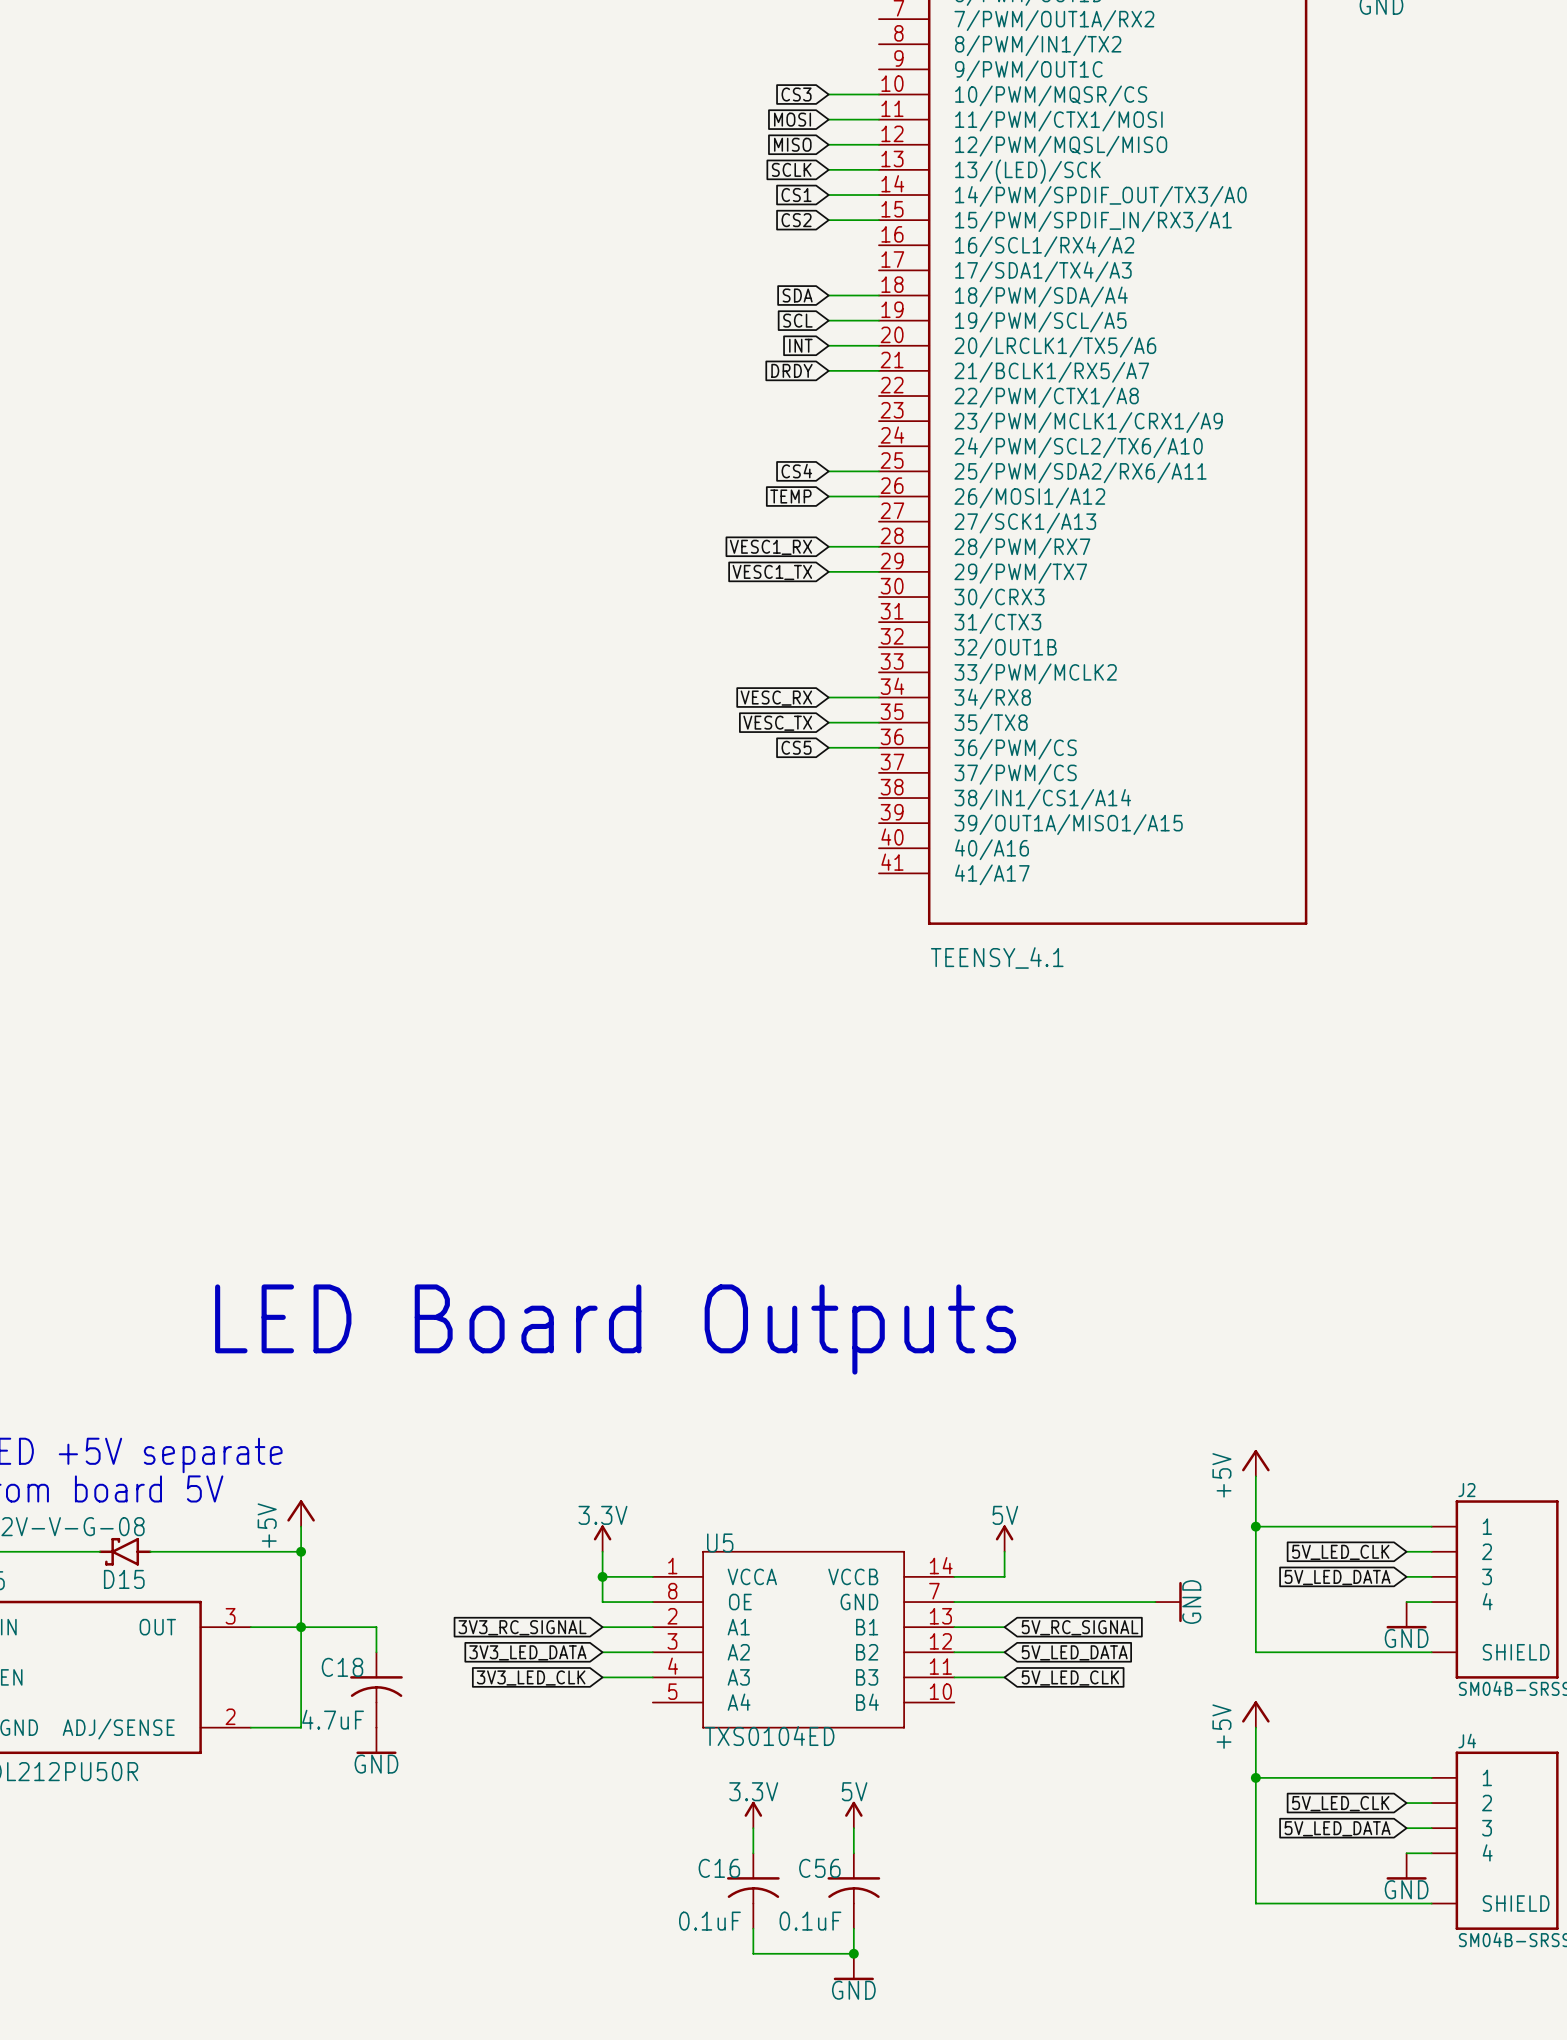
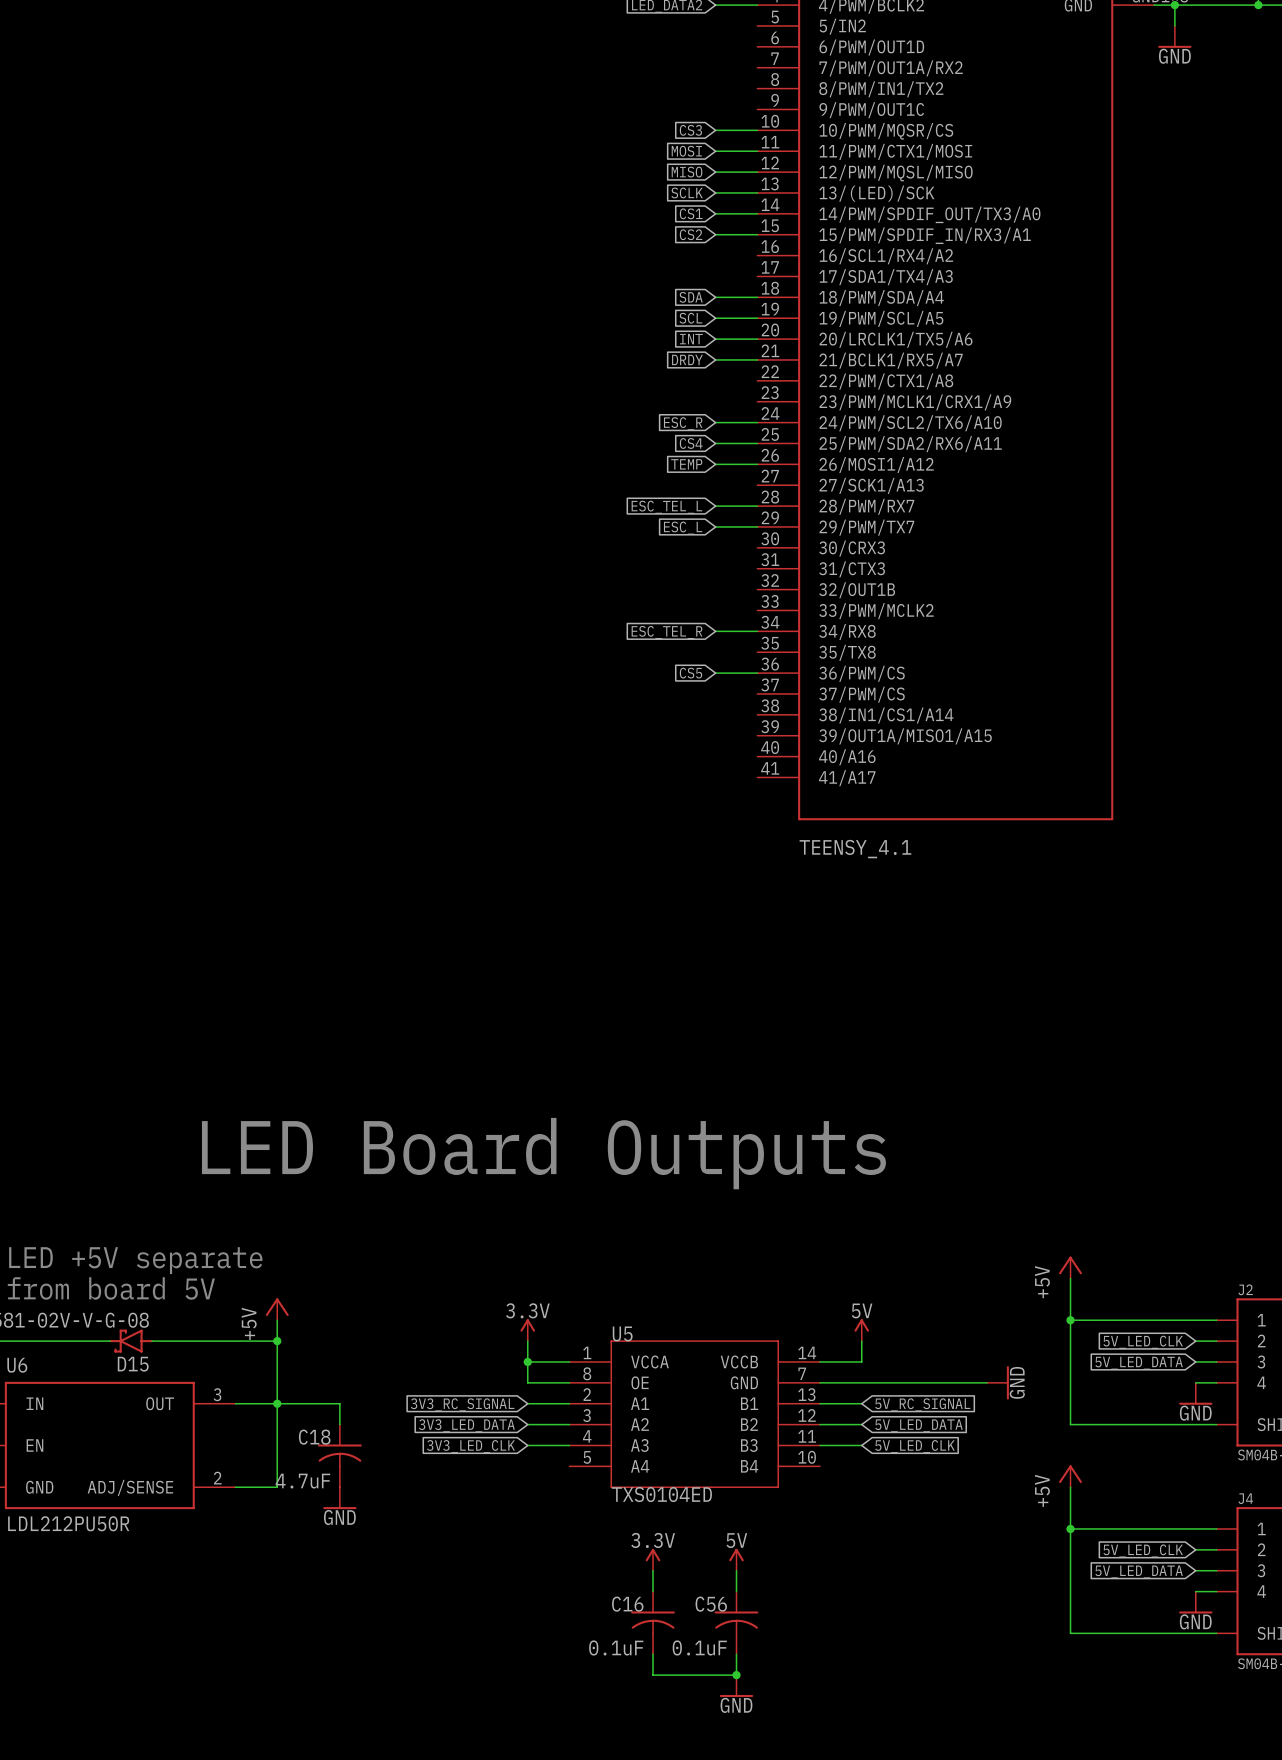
global label: none -> ESC_R (683, 423)
wire: none -> (715, 422) (757, 422)
global label: VESC1_RX (770, 547) -> ESC_TEL_L (666, 507)
global label: VESC1_TX (772, 572) -> ESC_L (683, 528)
global label: VESC_RX (776, 698) -> ESC_TEL_R (667, 632)
wire: (828, 722) (878, 722) -> none
global label: VESC_TX (777, 723) -> none

